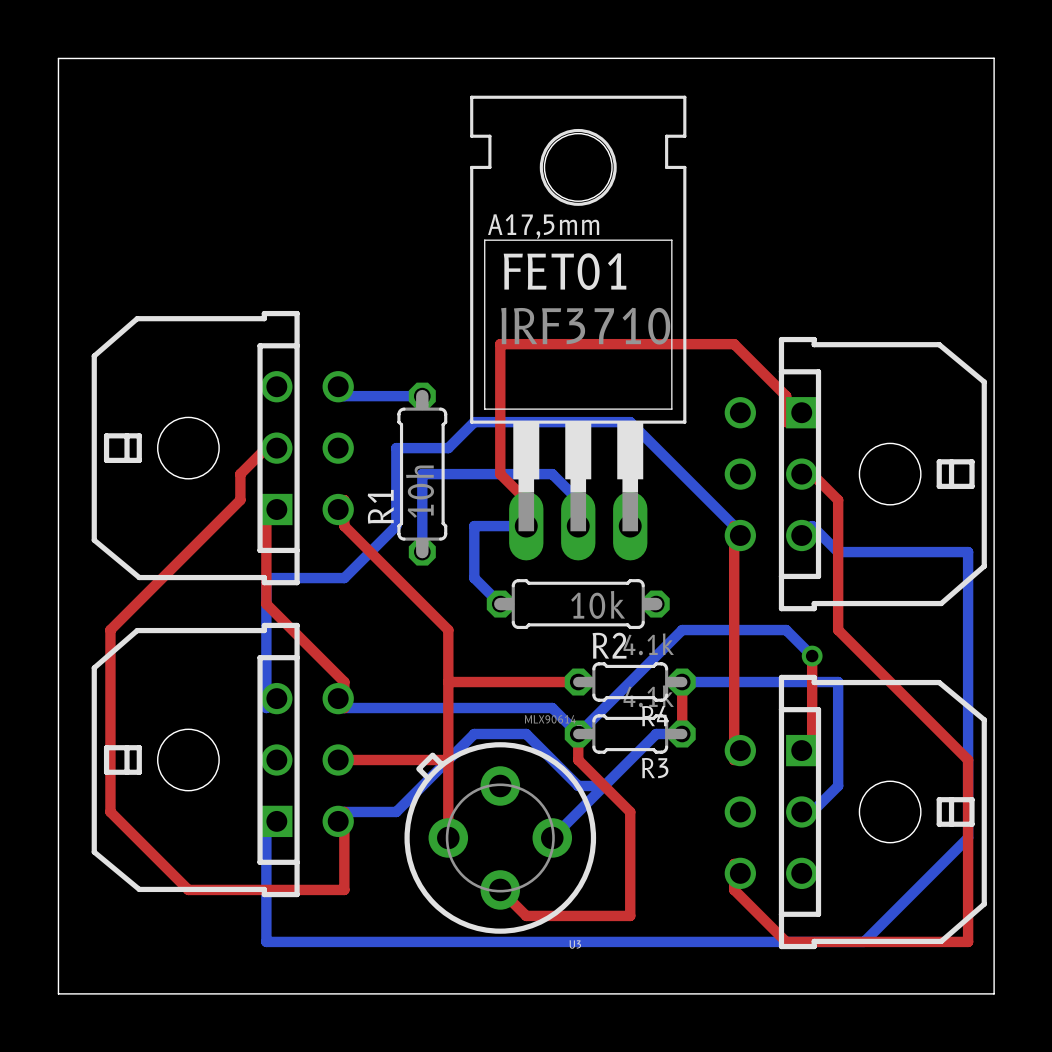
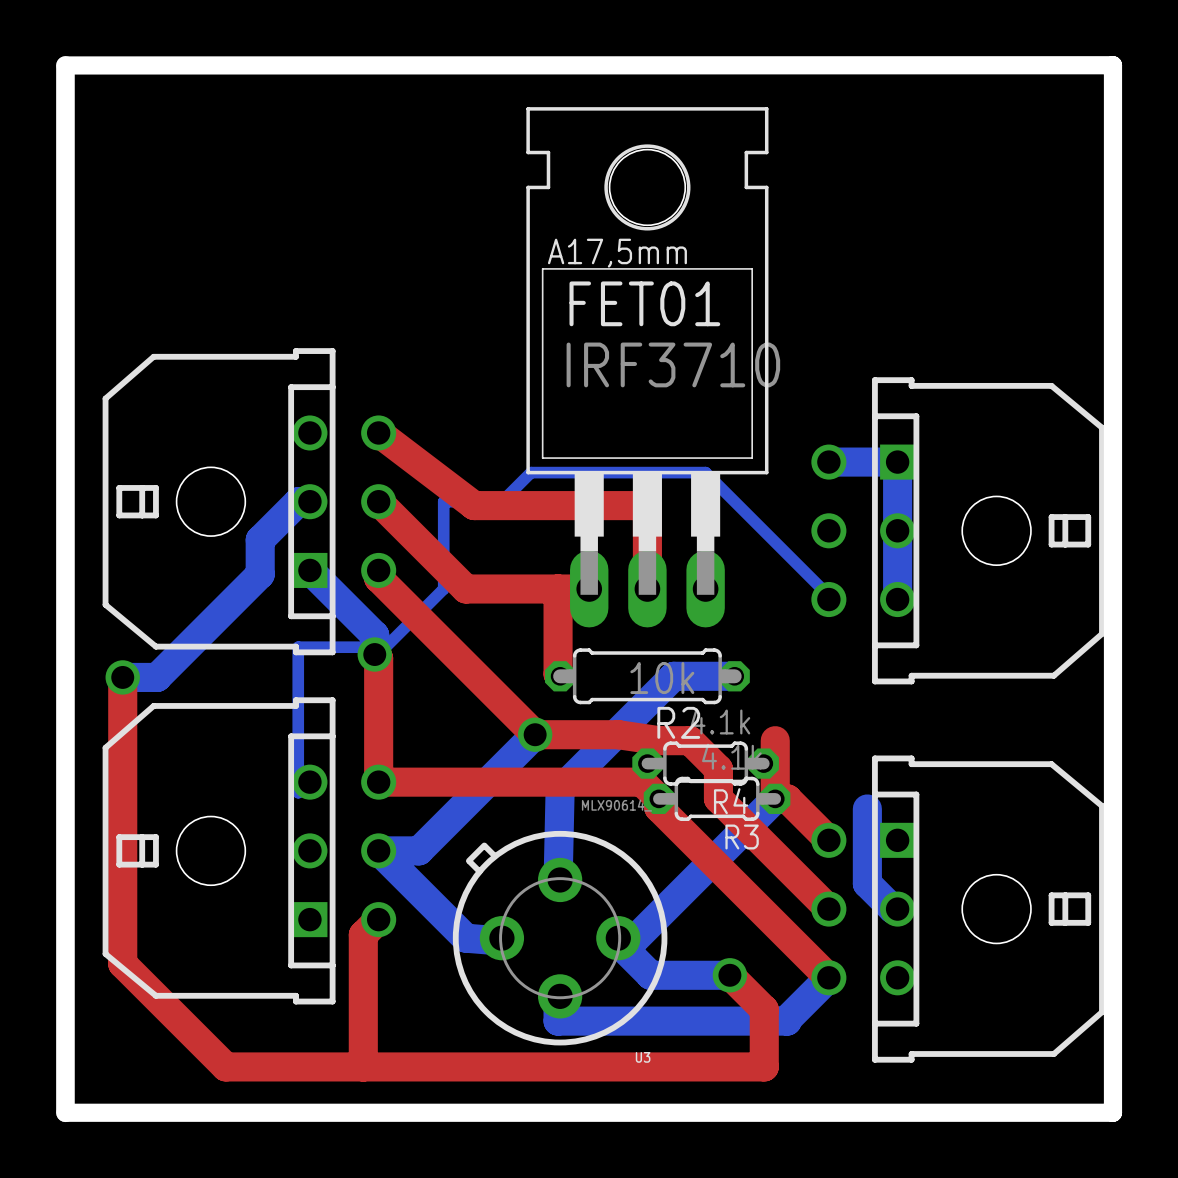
board edge width: thin (994, 58) (994, 993) (58, 993) (58, 58) (994, 58) -> thick (1112, 65) (1112, 1112) (65, 1112) (65, 65) (1112, 65)
top track: none -> (378, 432) (474, 505) (647, 505) (647, 589)
bottom track: (338, 386) (344, 396) (422, 396) -> none
top track: (801, 412) (786, 422) (786, 396) (734, 344) (500, 344) (500, 474) (526, 500) (526, 526) -> (378, 501) (465, 589) (589, 589)
top track: (276, 448) (266, 448) (240, 474) (240, 500) (110, 630) (110, 811) (188, 889) (344, 889) (344, 811) (338, 821) -> (363, 1066) (363, 934) (378, 919)
bottom track: none -> (309, 501) (298, 501) (260, 539) (260, 574) (157, 677) (122, 677)
R1: 10h (422, 474) -> none
top track: (801, 474) (812, 474) (838, 500) (838, 630) (968, 759) (968, 941) (786, 941) (734, 889) (734, 863) (740, 873) -> (374, 654) (378, 658) (378, 782) (642, 782) (658, 798) (658, 807) (828, 977)
top track: (276, 509) (266, 500) (266, 604) (344, 682) (344, 708) (338, 698) -> none
bottom track: none -> (309, 570) (374, 635) (374, 654)
top track: (338, 509) (344, 500) (344, 526) (448, 630) (448, 837) -> (378, 570) (378, 578) (535, 734) (618, 734) (658, 740) (690, 740) (718, 769) (718, 798) (828, 909)
top track: none -> (558, 589) (558, 674) (560, 676)
bottom track: (526, 526) (474, 526) (474, 578) (500, 604) -> none
bottom track: (578, 526) (578, 500) (552, 474) (422, 474) (422, 552) -> none
top track: (740, 535) (734, 526) (734, 759) (740, 750) -> (775, 740) (775, 798) (787, 798) (828, 840)
bottom track: (801, 535) (812, 526) (838, 552) (968, 552) (968, 837) (864, 941) (266, 941) (266, 811) (276, 821) -> (897, 599) (897, 462) (828, 462)
via: none -> (374, 654)
bottom track: none -> (734, 676) (673, 676) (560, 789) (558, 882)
top track: none -> (122, 677) (122, 963) (225, 1066) (764, 1066) (764, 1009) (729, 975)
via: none -> (122, 677)
bottom track: none -> (535, 734) (418, 850) (378, 850) (465, 938) (499, 940)
via: none -> (535, 734)
top track: (812, 656) (812, 759) (801, 750) -> none
bottom track: (812, 656) (786, 630) (682, 630) (578, 734) (552, 708) (344, 708) (338, 698) -> none
via: (812, 656) -> none
top track: (448, 682) (578, 682) -> none
top track: (682, 682) (682, 734) -> none
bottom track: (682, 682) (838, 682) (838, 785) (812, 811) (801, 811) -> (867, 808) (867, 883) (892, 909) (897, 909)
bottom track: none -> (775, 798) (633, 940) (616, 940) (650, 975) (729, 975)
top track: (578, 734) (578, 759) (630, 811) (630, 915) (526, 915) (500, 889) -> none
R3 position: (630, 734) -> (717, 798)
bottom track: (682, 734) (656, 734) (552, 837) -> none
top track: (338, 759) (448, 759) -> none
bottom track: (604, 785) (578, 785) (526, 734) (474, 734) (396, 811) (344, 811) (338, 821) -> none
via: none -> (729, 975)
bottom track: none -> (828, 977) (787, 1021) (558, 1021) (558, 999)

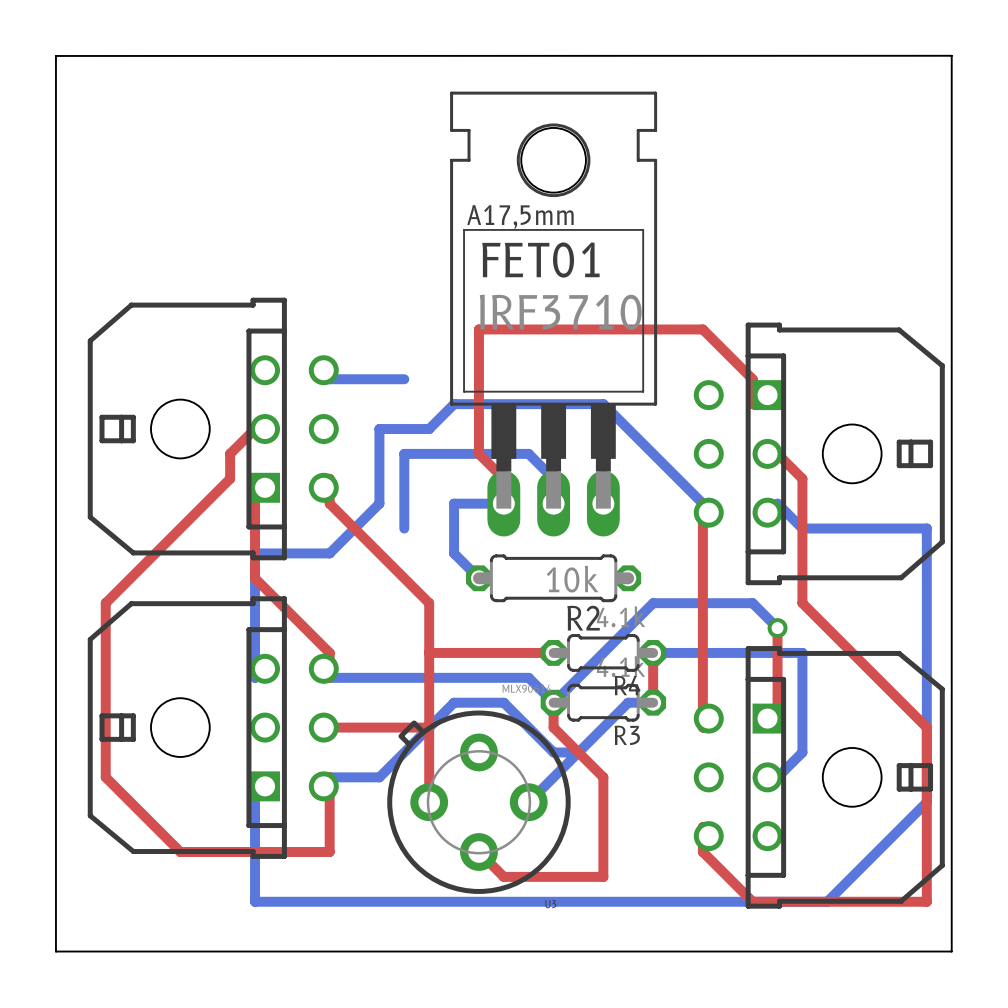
board edge width: thick (1112, 65) (1112, 1112) (65, 1112) (65, 65) (1112, 65) -> thin (951, 55) (951, 951) (55, 951) (55, 55) (951, 55)
top track: (378, 432) (474, 505) (647, 505) (647, 589) -> none
bottom track: none -> (323, 370) (329, 379) (404, 379)
bottom track: (828, 462) (897, 462) (897, 599) -> (265, 786) (255, 777) (255, 901) (827, 901) (926, 802) (926, 528) (802, 528) (777, 503) (767, 512)
bottom track: (309, 501) (298, 501) (260, 539) (260, 574) (157, 677) (122, 677) -> none
top track: (378, 501) (465, 589) (589, 589) -> (767, 395) (752, 404) (752, 379) (702, 329) (478, 329) (478, 453) (503, 478) (503, 503)
top track: none -> (265, 487) (255, 478) (255, 578) (329, 652) (329, 677) (323, 668)
bottom track: (309, 570) (374, 635) (374, 654) -> none
top track: (378, 570) (378, 578) (535, 734) (618, 734) (658, 740) (690, 740) (718, 769) (718, 798) (828, 909) -> (323, 487) (329, 478) (329, 503) (429, 603) (429, 802)
top track: (558, 589) (558, 674) (560, 676) -> none
bottom track: none -> (503, 503) (454, 503) (454, 553) (478, 578)
bottom track: none -> (553, 503) (553, 478) (528, 453) (404, 453) (404, 528)
top track: (374, 654) (378, 658) (378, 782) (642, 782) (658, 798) (658, 807) (828, 977) -> (767, 453) (777, 453) (802, 478) (802, 603) (926, 727) (926, 901) (752, 901) (702, 852) (702, 827) (708, 836)
via: (374, 654) -> none
bottom track: (734, 676) (673, 676) (560, 789) (558, 882) -> none
top track: (122, 677) (122, 963) (225, 1066) (764, 1066) (764, 1009) (729, 975) -> none
via: (122, 677) -> none
bottom track: (535, 734) (418, 850) (378, 850) (465, 938) (499, 940) -> none
via: (535, 734) -> none
top track: none -> (777, 628) (777, 727) (767, 718)
bottom track: none -> (777, 628) (752, 603) (653, 603) (553, 702) (528, 677) (329, 677) (323, 668)
via: none -> (777, 628)
top track: (775, 740) (775, 798) (787, 798) (828, 840) -> (708, 512) (702, 503) (702, 727) (708, 718)
top track: none -> (429, 652) (553, 652)
top track: none -> (653, 652) (653, 702)
R3 position: (717, 798) -> (603, 702)
bottom track: (775, 798) (633, 940) (616, 940) (650, 975) (729, 975) -> none
bottom track: (867, 808) (867, 883) (892, 909) (897, 909) -> (653, 652) (802, 652) (802, 752) (777, 777) (767, 777)
top track: none -> (553, 702) (553, 727) (603, 777) (603, 876) (503, 876) (478, 852)
bottom track: none -> (653, 702) (628, 702) (528, 802)
top track: none -> (323, 727) (429, 727)
bottom track: none -> (578, 752) (553, 752) (503, 702) (454, 702) (379, 777) (329, 777) (323, 786)
top track: (378, 919) (363, 934) (363, 1066) -> (323, 786) (329, 777) (329, 852) (180, 852) (105, 777) (105, 603) (230, 478) (230, 453) (255, 429) (265, 429)
via: (729, 975) -> none
bottom track: (828, 977) (787, 1021) (558, 1021) (558, 999) -> none

